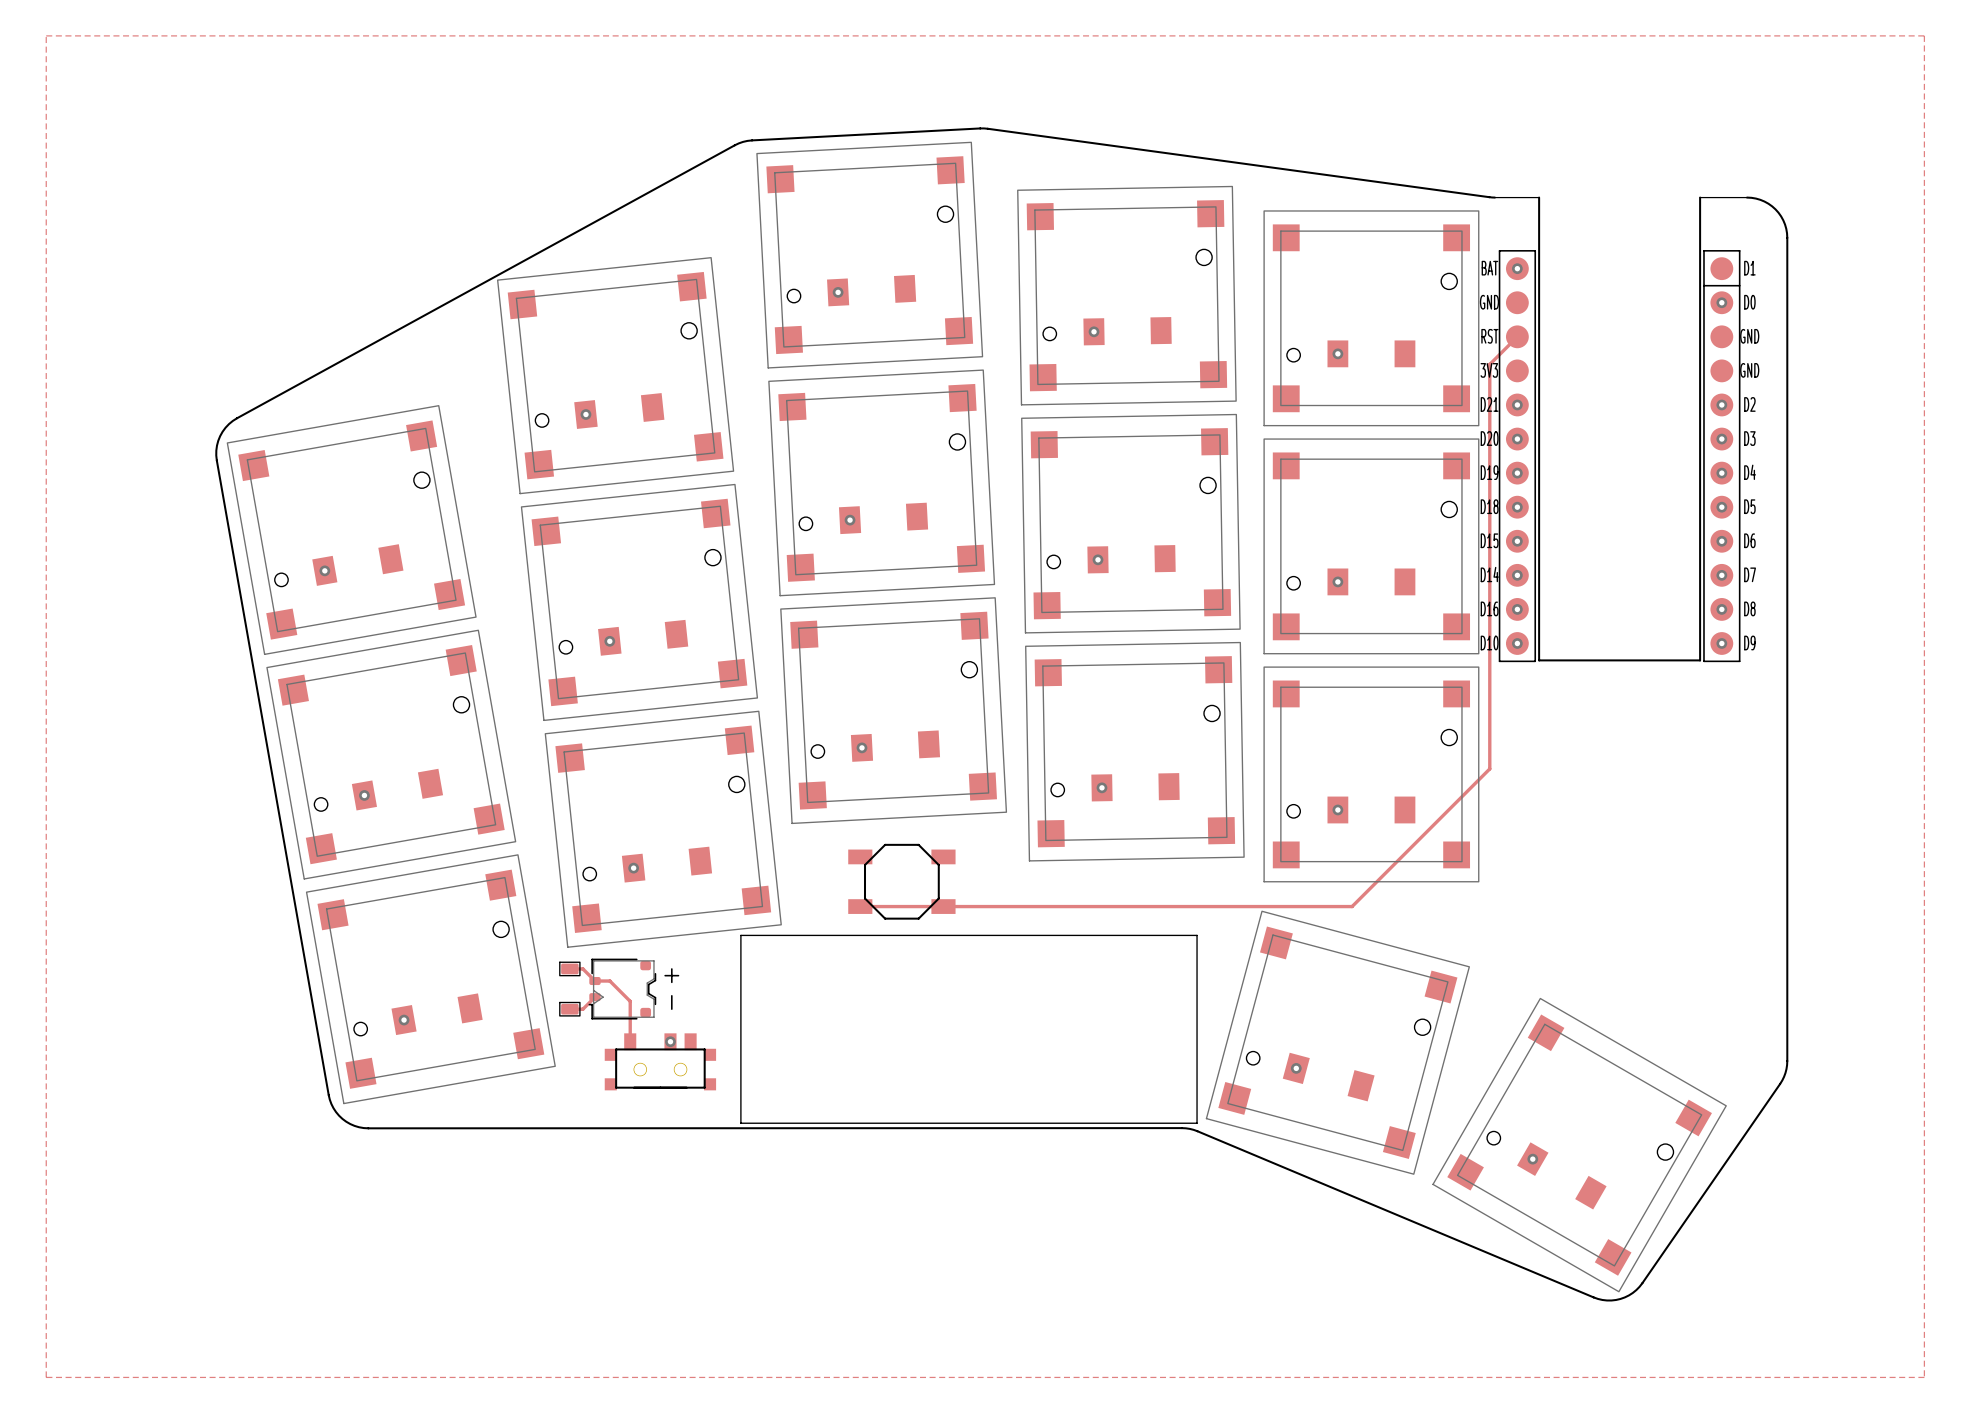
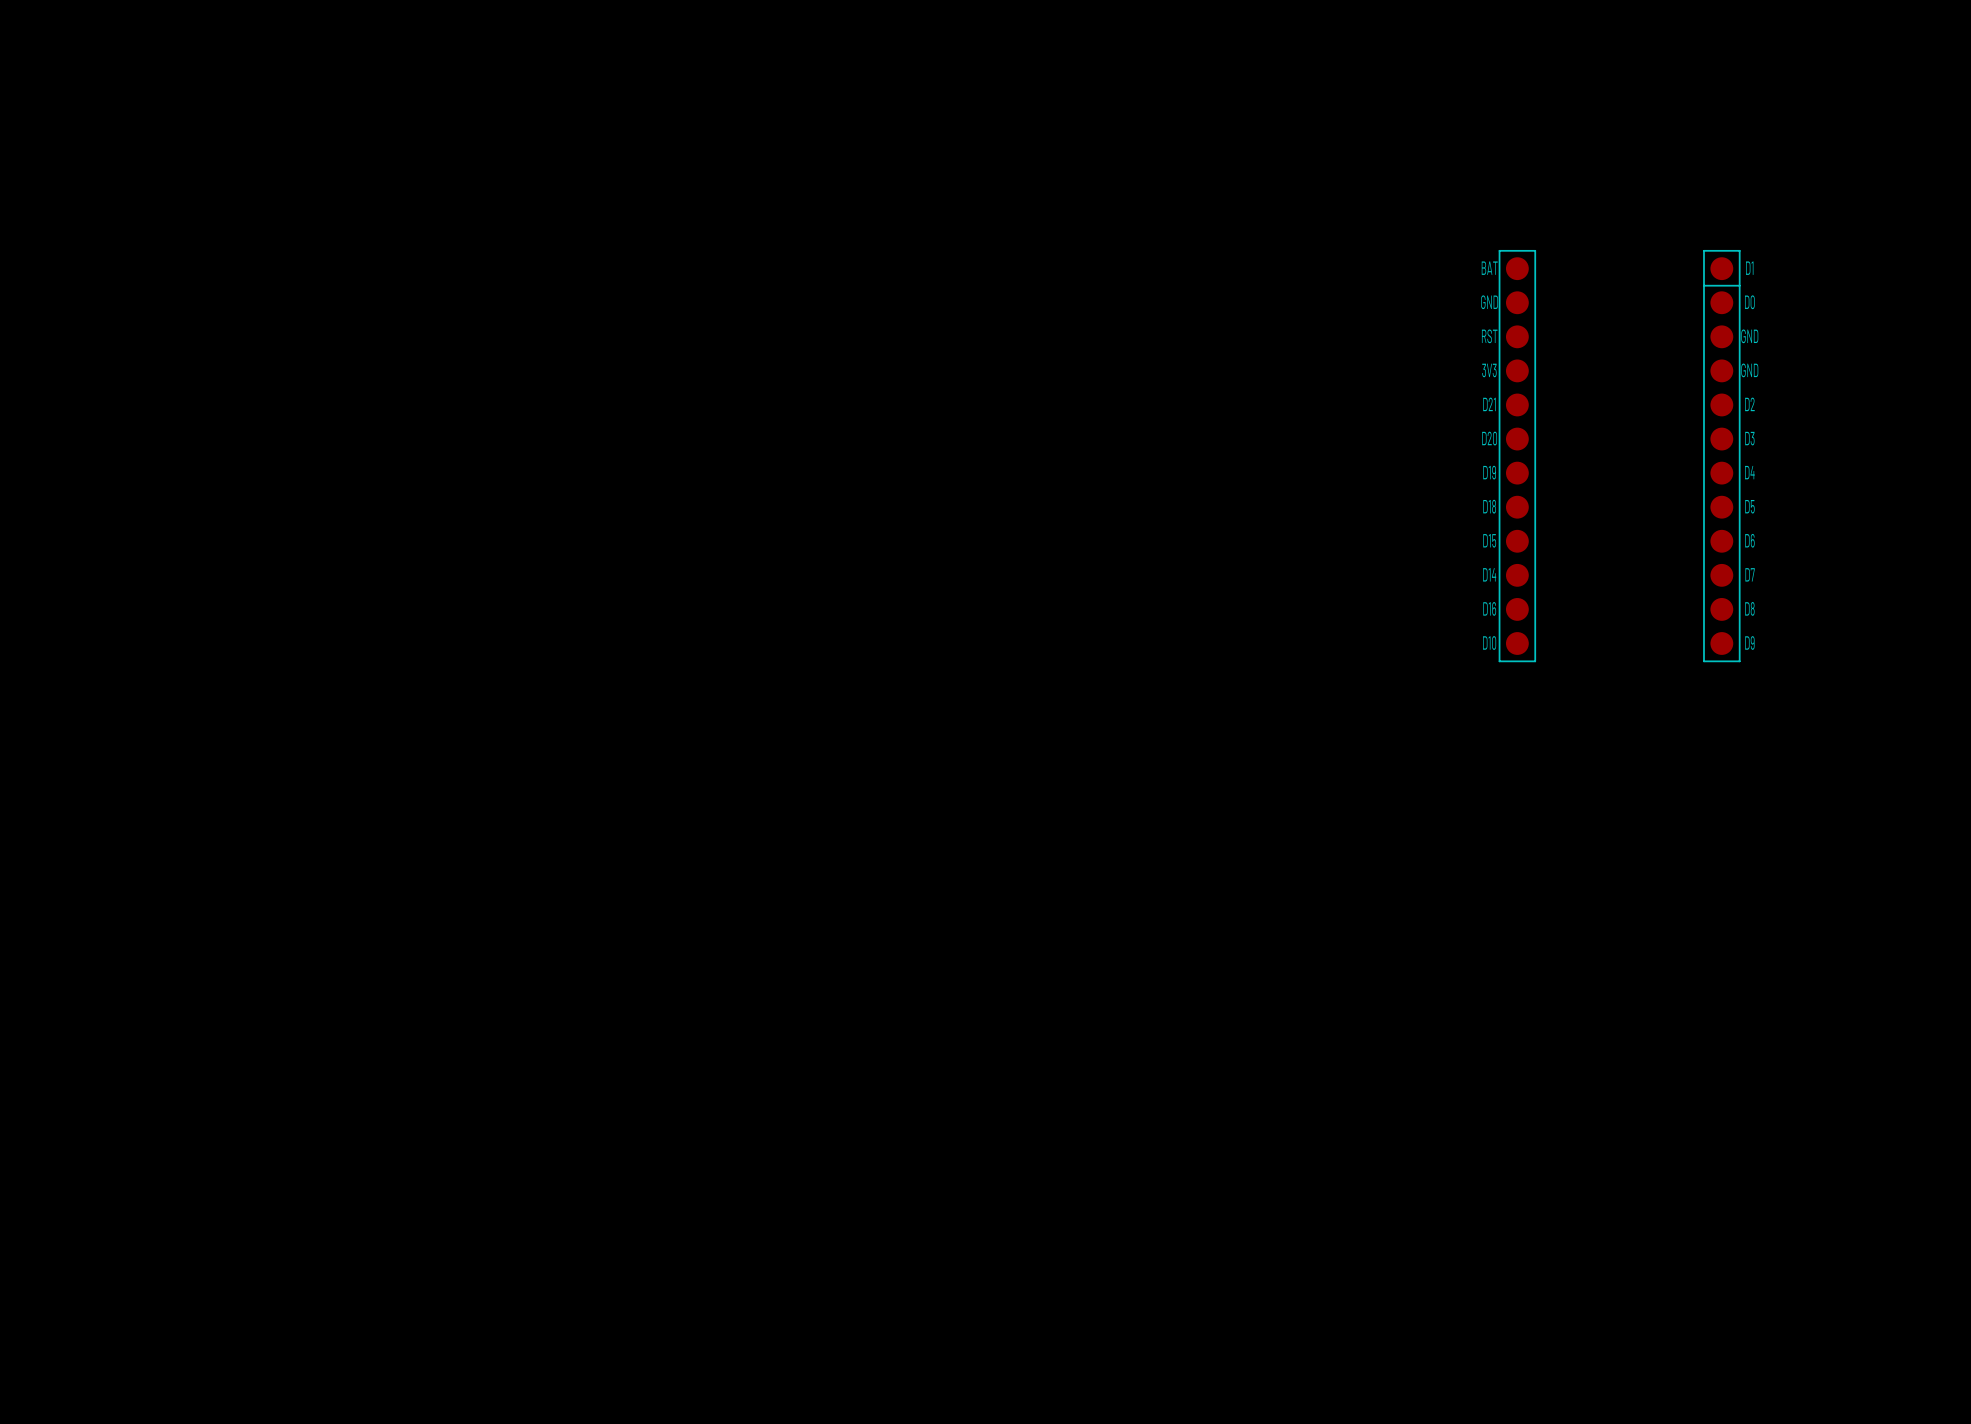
zone outline: (46, 35) (46, 1377) (1924, 1377) (1924, 35) (46, 35) -> none
board edge: (980, 128) (752, 140) (738, 143) (237, 418) (222, 431) (217, 445) (216, 460) (328, 1095) (333, 1108) (346, 1121) (359, 1127) (368, 1128) (1185, 1128) (1197, 1131) (1593, 1297) (1611, 1300) (1628, 1295) (1642, 1283) (1780, 1083) (1787, 1065) (1787, 237) (1785, 224) (1781, 216) (1772, 206) (1756, 198) (1700, 197) (1700, 660) (1539, 660) (1539, 197) (1489, 197) (980, 128) -> none
part: (869, 255) -> none
via: (1517, 268) -> none
via: (838, 292) -> none
part: (1126, 295) -> none
via: (1721, 302) -> none
part: (1371, 318) -> none
via: (1094, 331) -> none
track: (1517, 336) (1489, 364) (1489, 768) (1352, 906) (860, 906) -> none
via: (1337, 353) -> none
part: (615, 375) -> none
via: (1517, 404) -> none
via: (1721, 404) -> none
via: (585, 414) -> none
via: (1517, 439) -> none
via: (1721, 439) -> none
via: (1517, 473) -> none
via: (1721, 473) -> none
part: (881, 482) -> none
via: (1517, 507) -> none
via: (1721, 507) -> none
via: (850, 520) -> none
part: (1130, 523) -> none
part: (351, 530) -> none
via: (1517, 541) -> none
via: (1721, 541) -> none
part: (1371, 546) -> none
via: (1097, 559) -> none
via: (324, 570) -> none
via: (1517, 575) -> none
via: (1721, 575) -> none
via: (1337, 581) -> none
part: (639, 602) -> none
via: (1517, 609) -> none
via: (1721, 609) -> none
via: (609, 641) -> none
via: (1517, 643) -> none
via: (1721, 643) -> none
part: (893, 710) -> none
via: (861, 747) -> none
part: (1134, 751) -> none
part: (391, 754) -> none
part: (1371, 774) -> none
via: (1101, 787) -> none
via: (364, 795) -> none
via: (1337, 809) -> none
part: (663, 829) -> none
via: (633, 868) -> none
part: (901, 881) -> none
drawing: [740, 934, 1198, 1124] -> none
track: (569, 968) (582, 968) (595, 981) (609, 981) (630, 1001) (630, 1041) -> none
part: (569, 968) -> none
part: (430, 979) -> none
part: (633, 989) -> none
track: (595, 997) (582, 1009) (569, 1009) -> none
part: (569, 1009) -> none
via: (404, 1020) -> none
via: (670, 1041) -> none
part: (1337, 1042) -> none
part: (660, 1061) -> none
via: (1296, 1068) -> none
part: (1579, 1145) -> none
via: (1532, 1159) -> none

